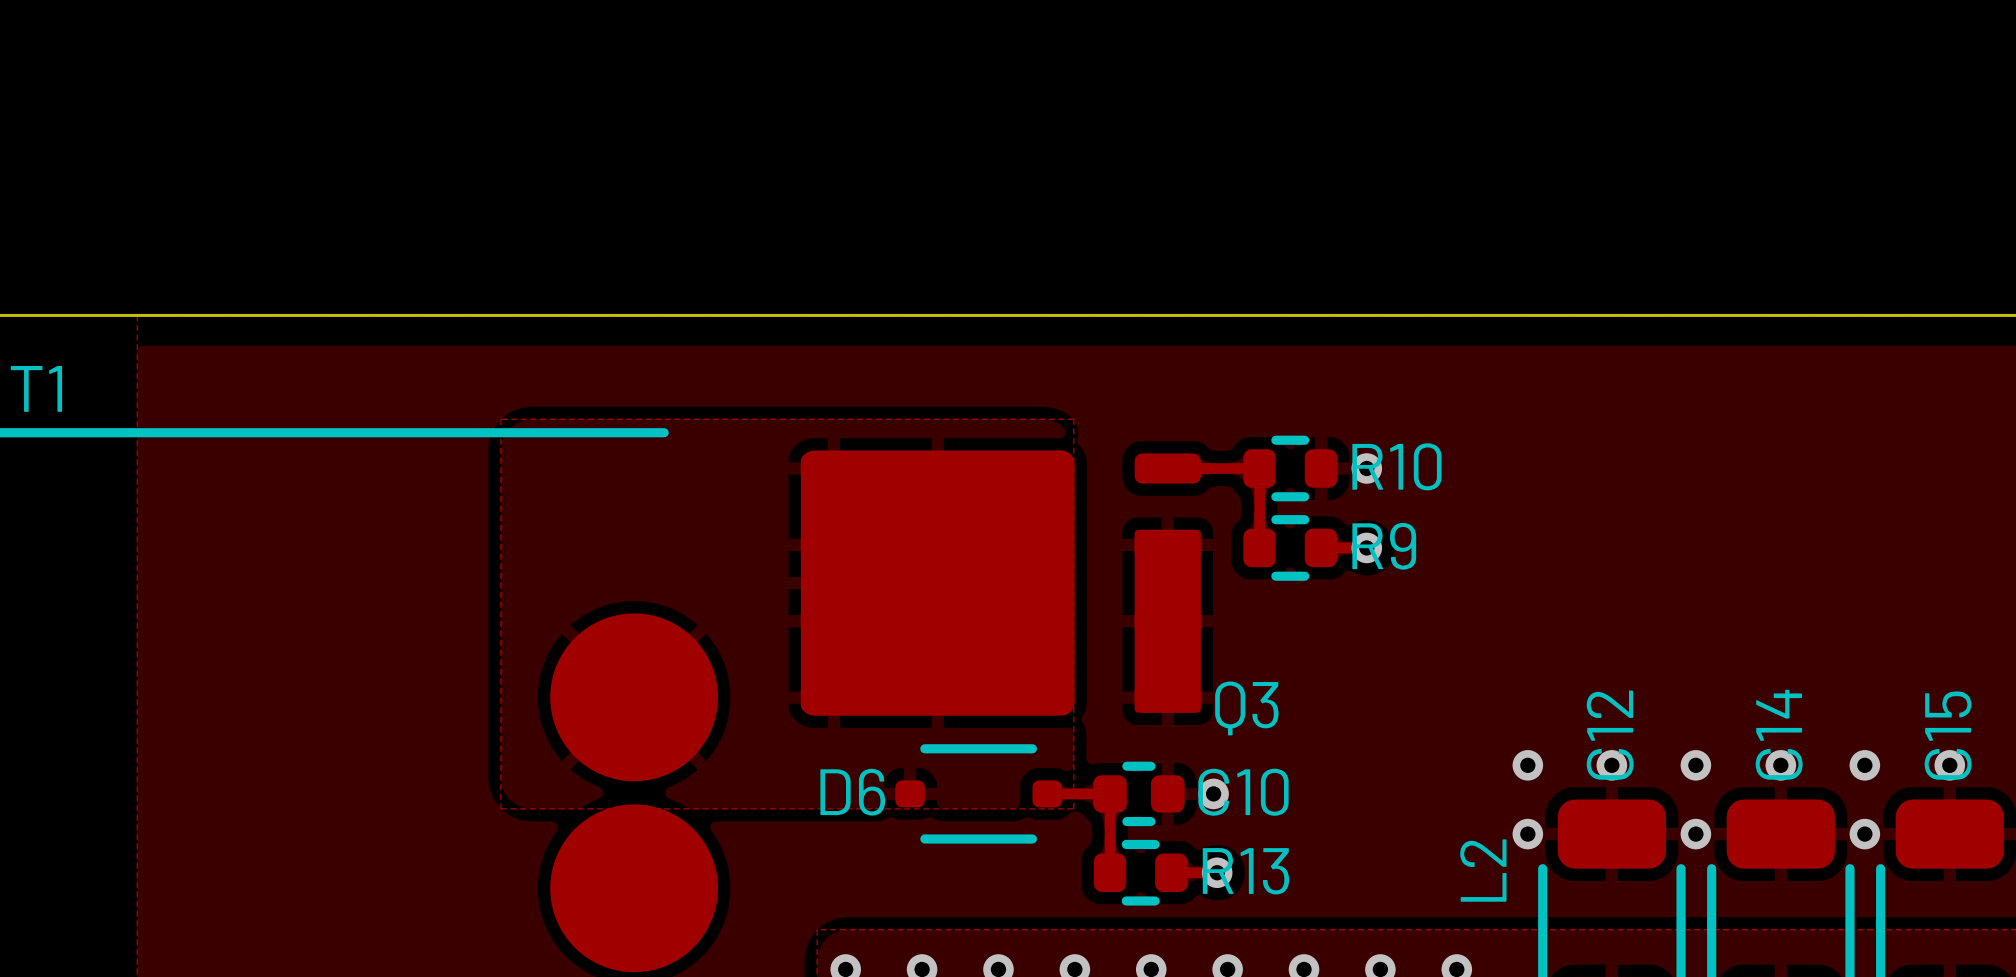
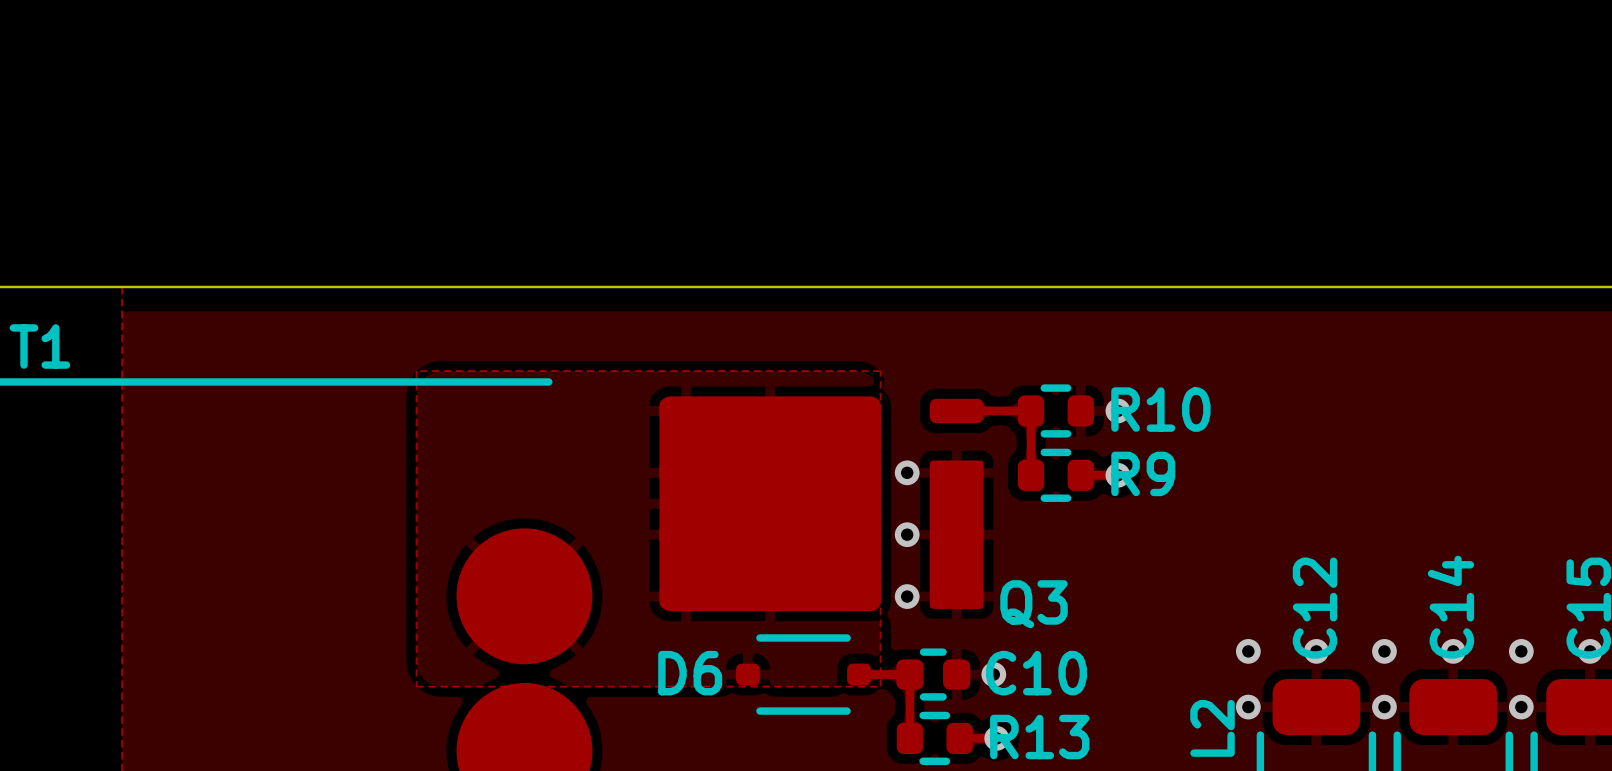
via: none -> (907, 472)
via: none -> (907, 534)
via: none -> (907, 596)

